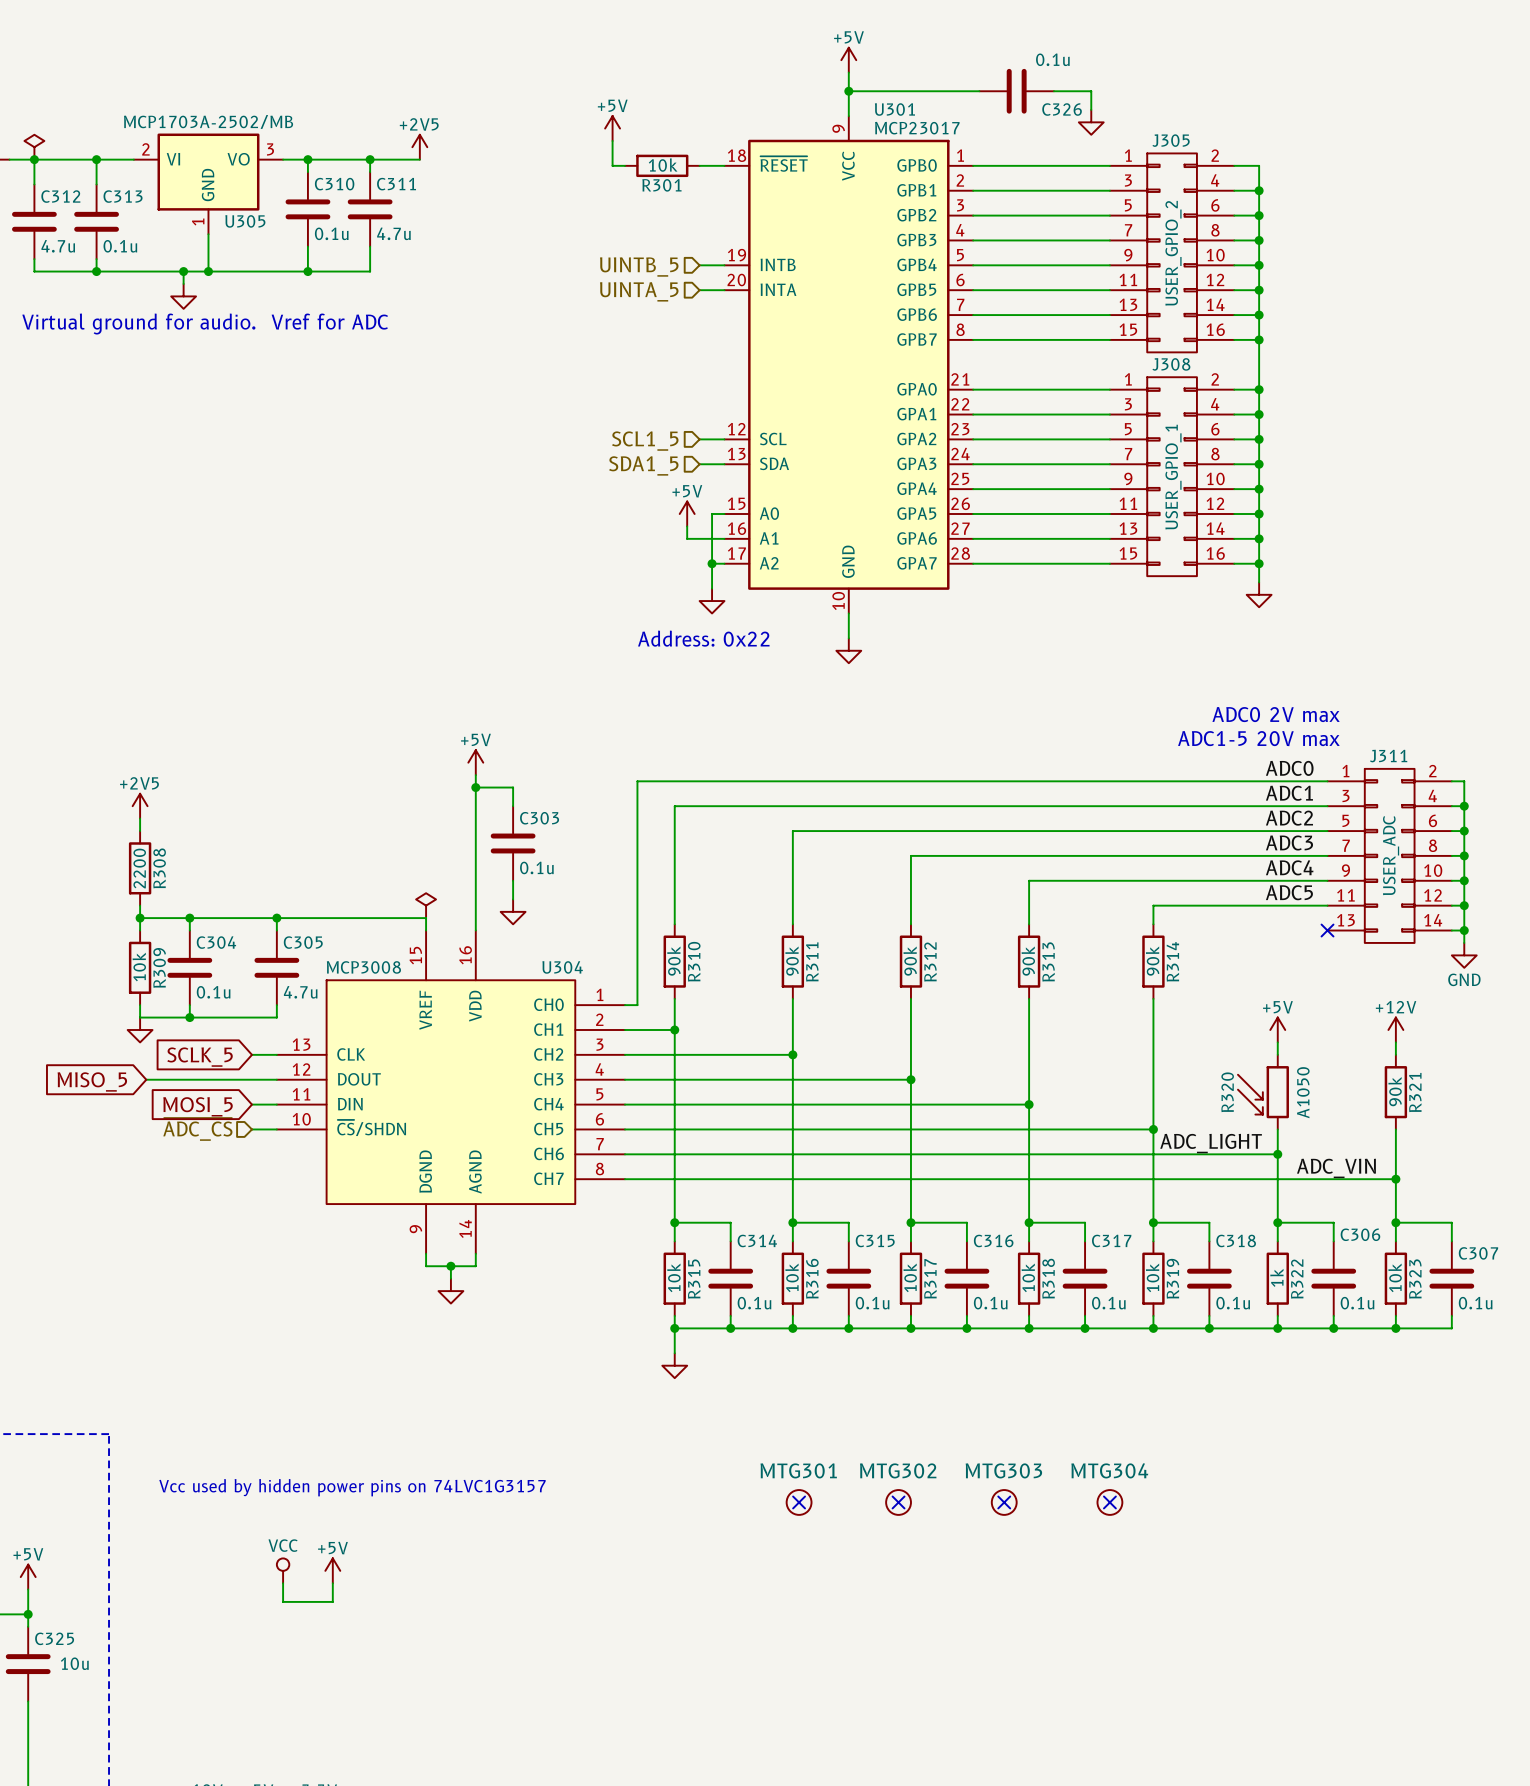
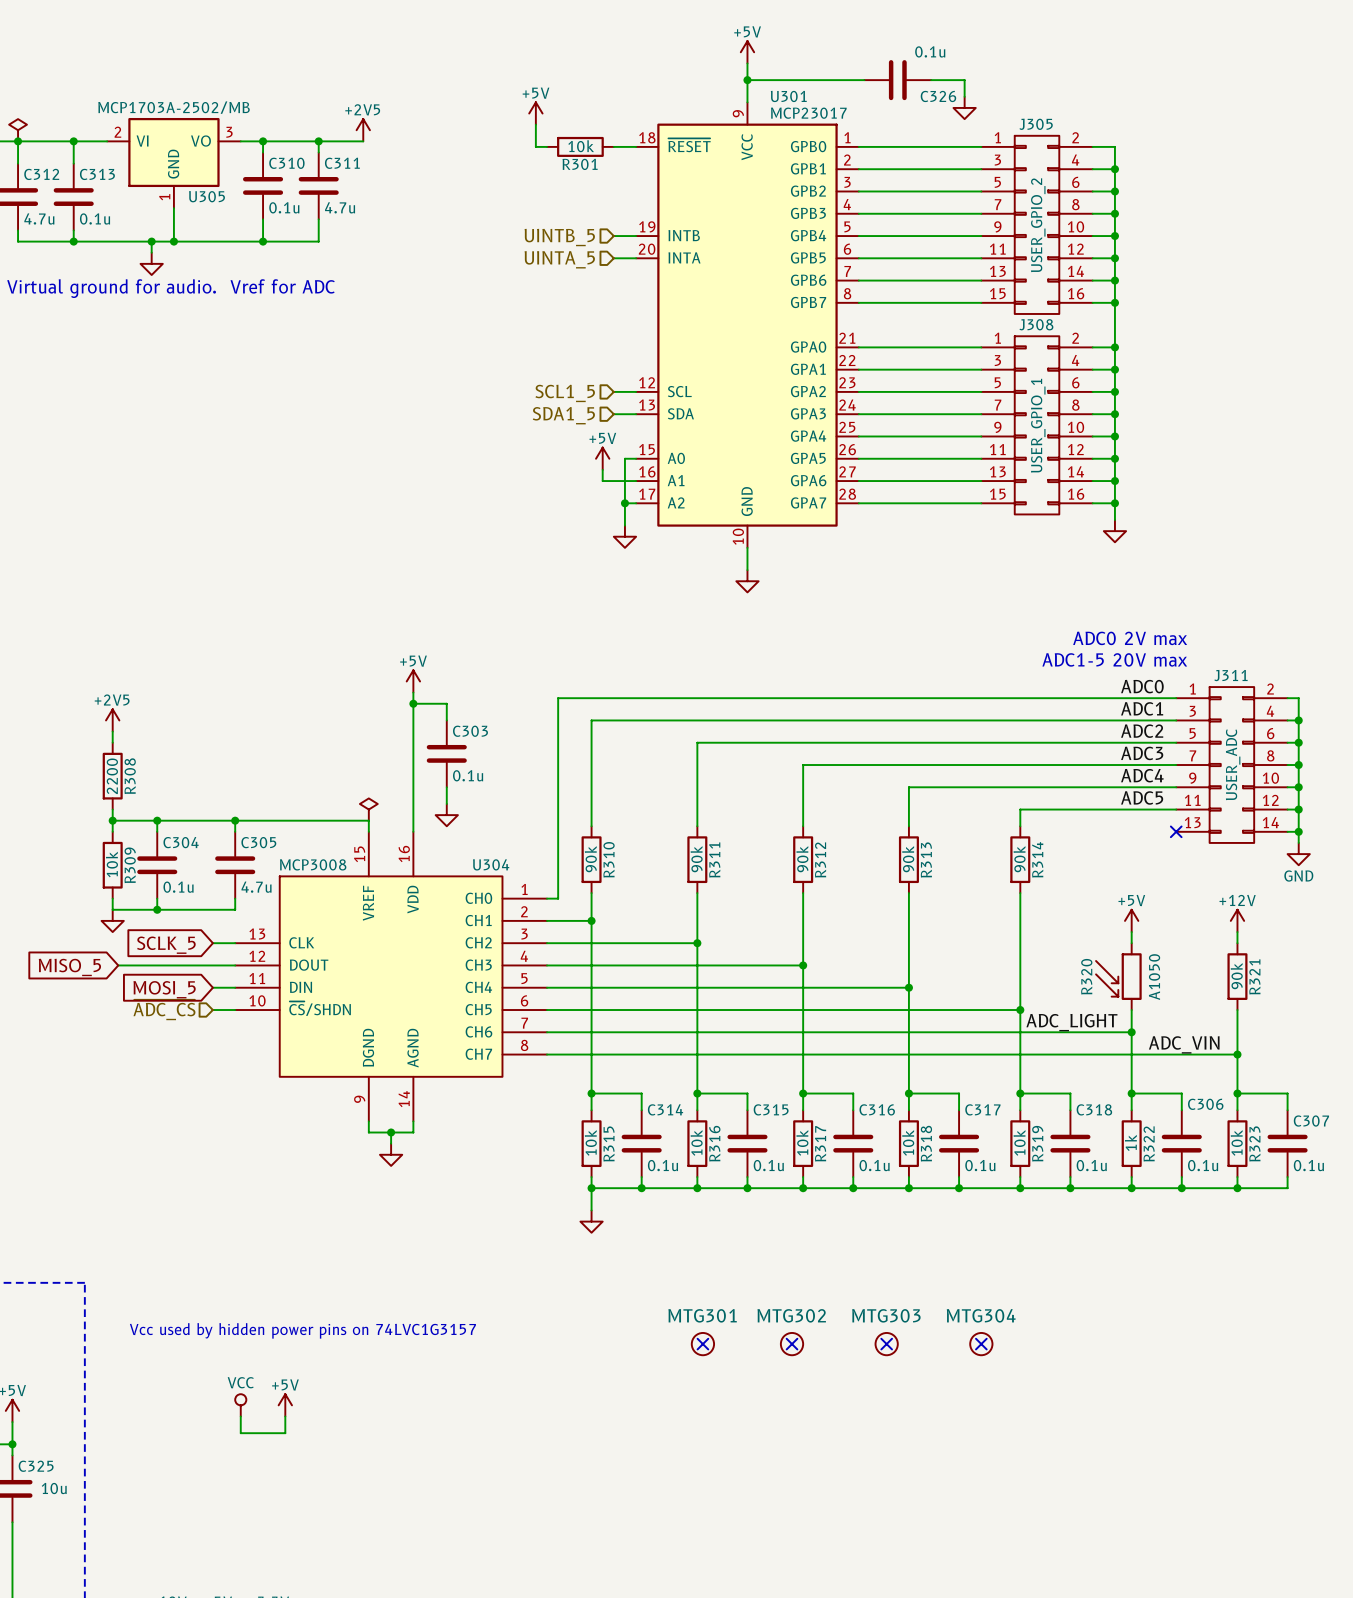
text: Address: 0x22 (703, 638) -> none

